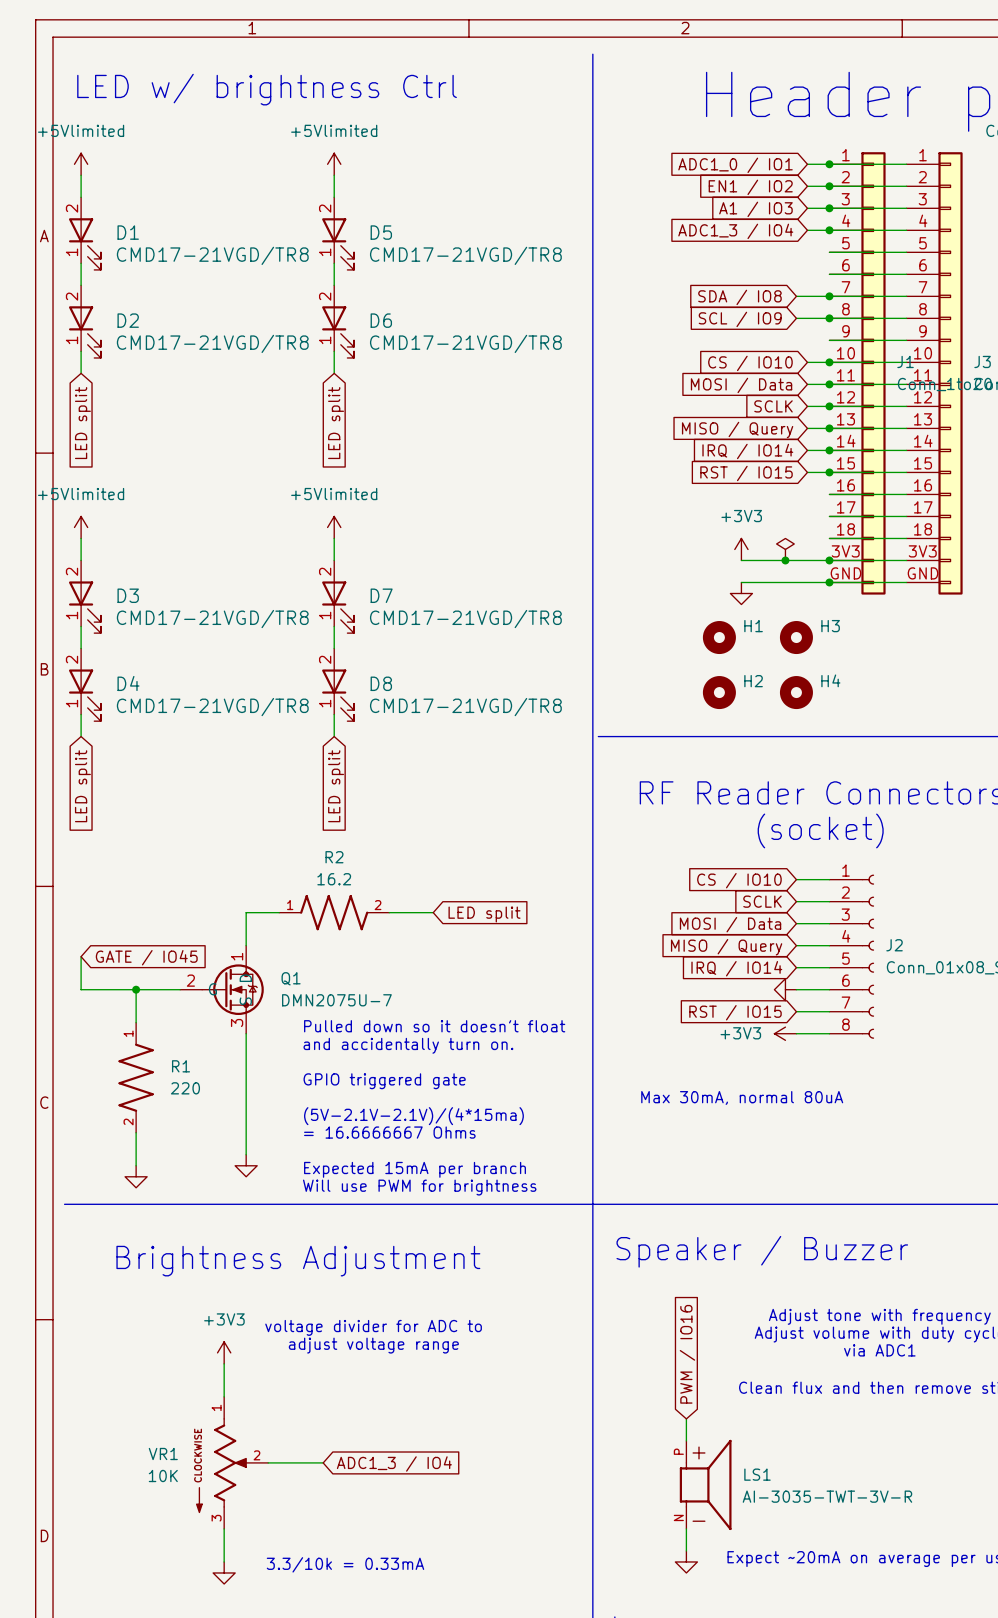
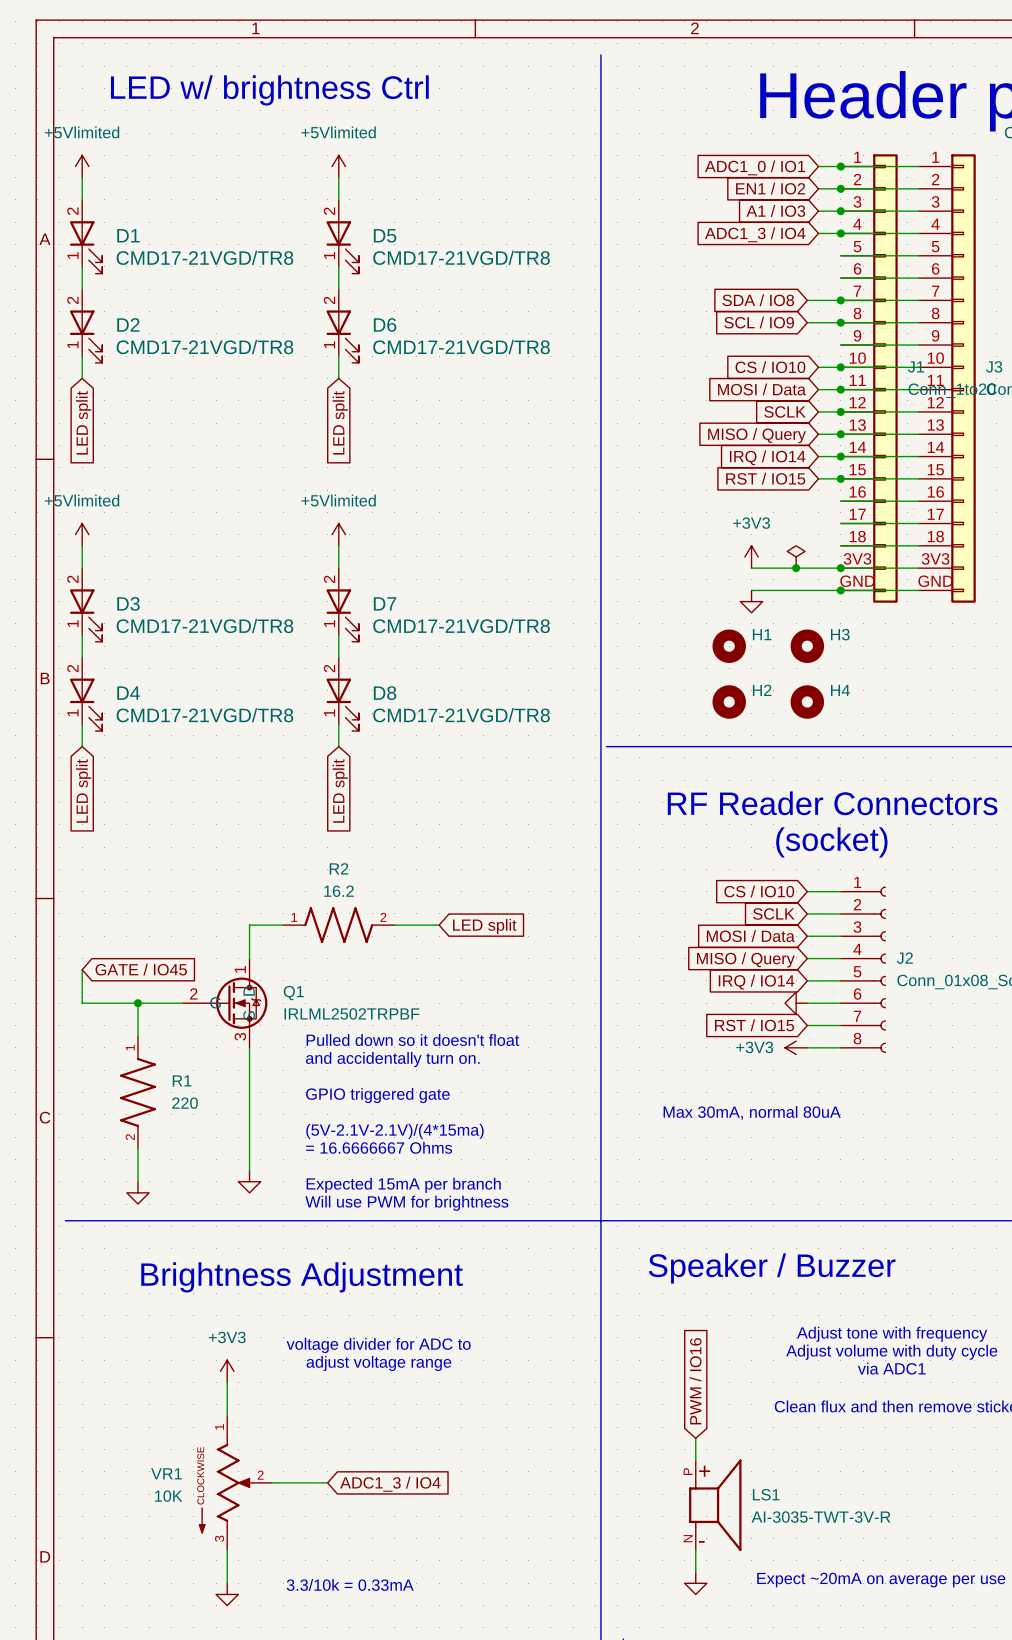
Q1 value: DMN2075U-7 (336, 1000) -> IRLML2502TRPBF (351, 1013)

